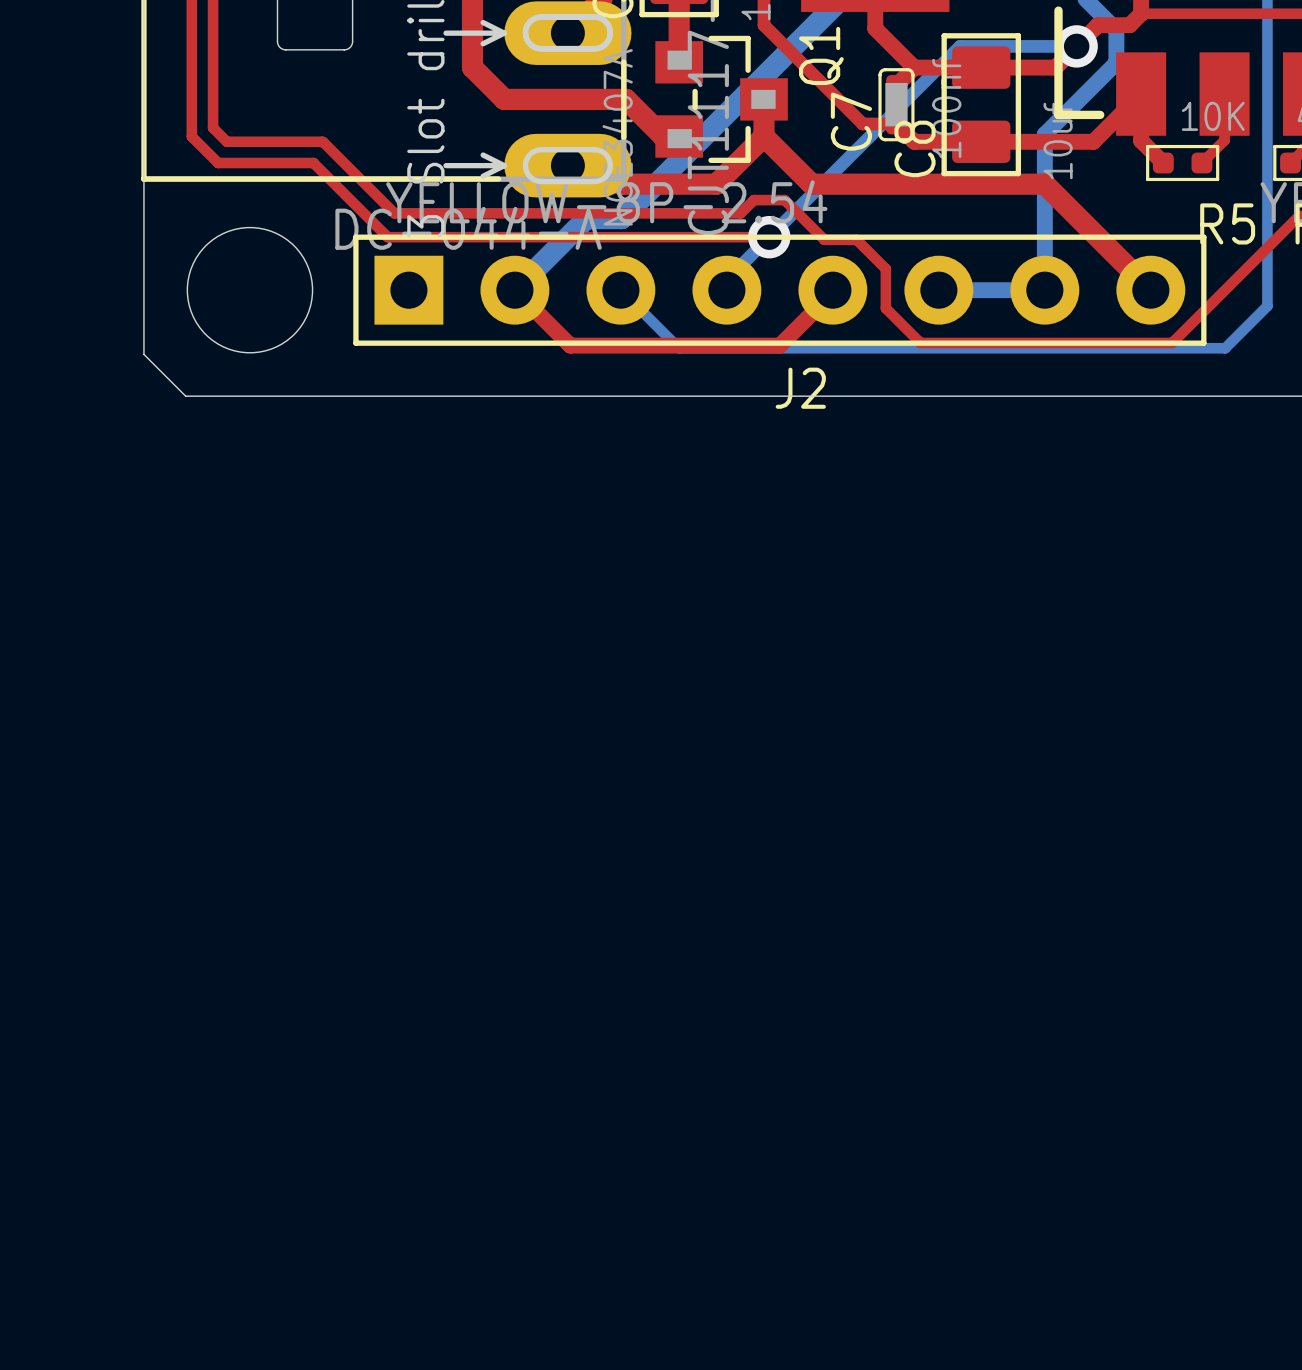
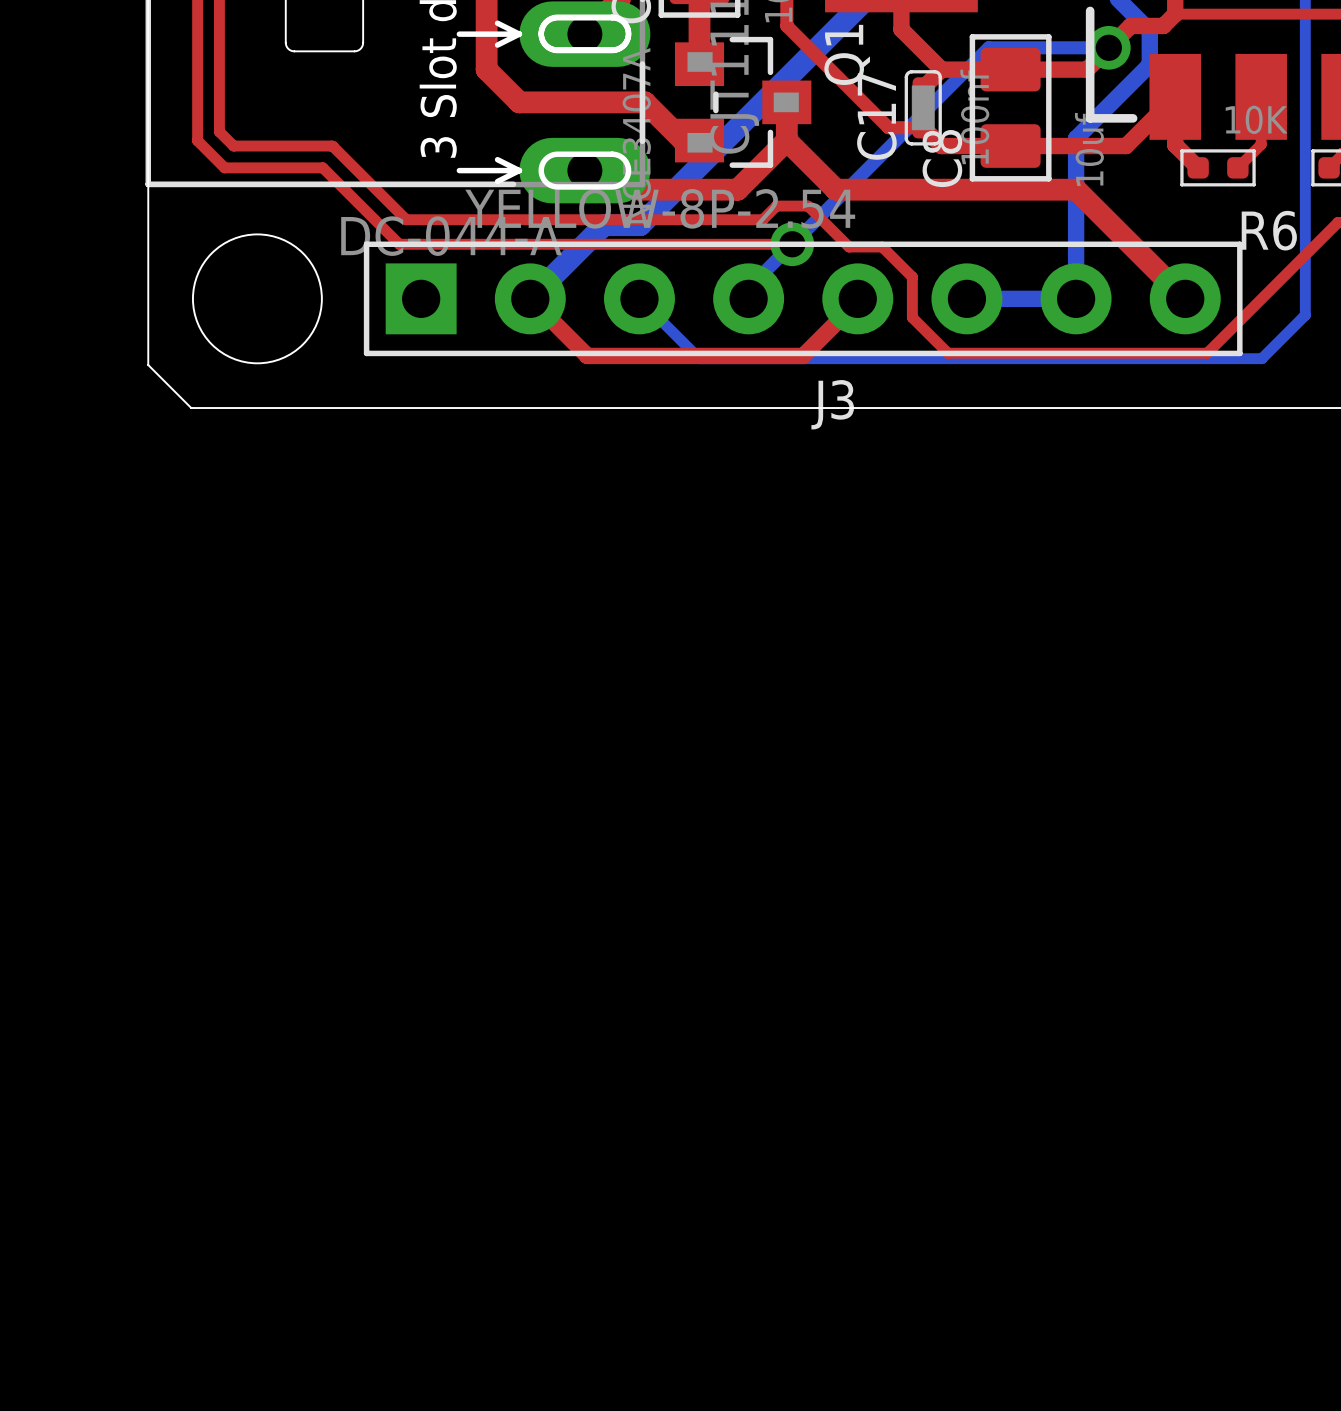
C7 name: C7 (851, 121) -> C17 (876, 116)
R5 name: R5 (1227, 223) -> R6 (1269, 230)
J2 name: J2 (800, 388) -> J3 (832, 404)

